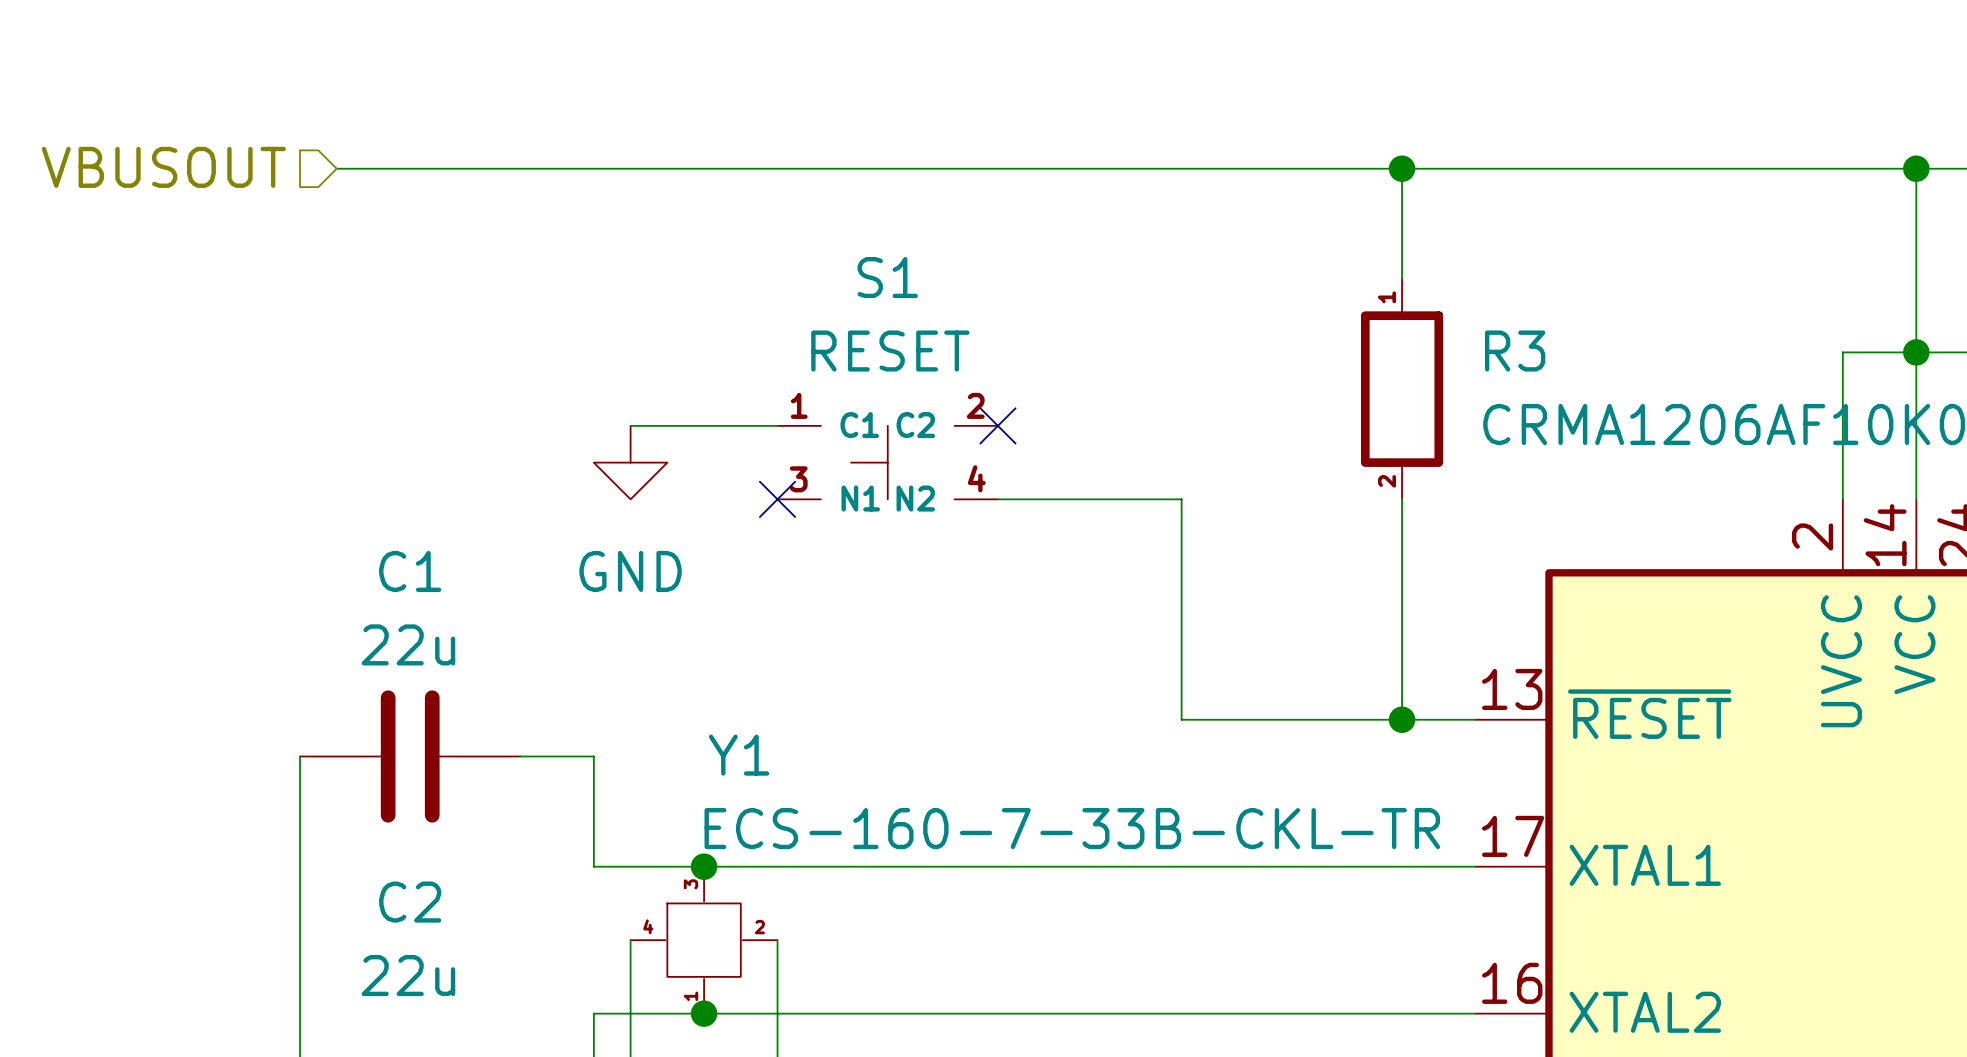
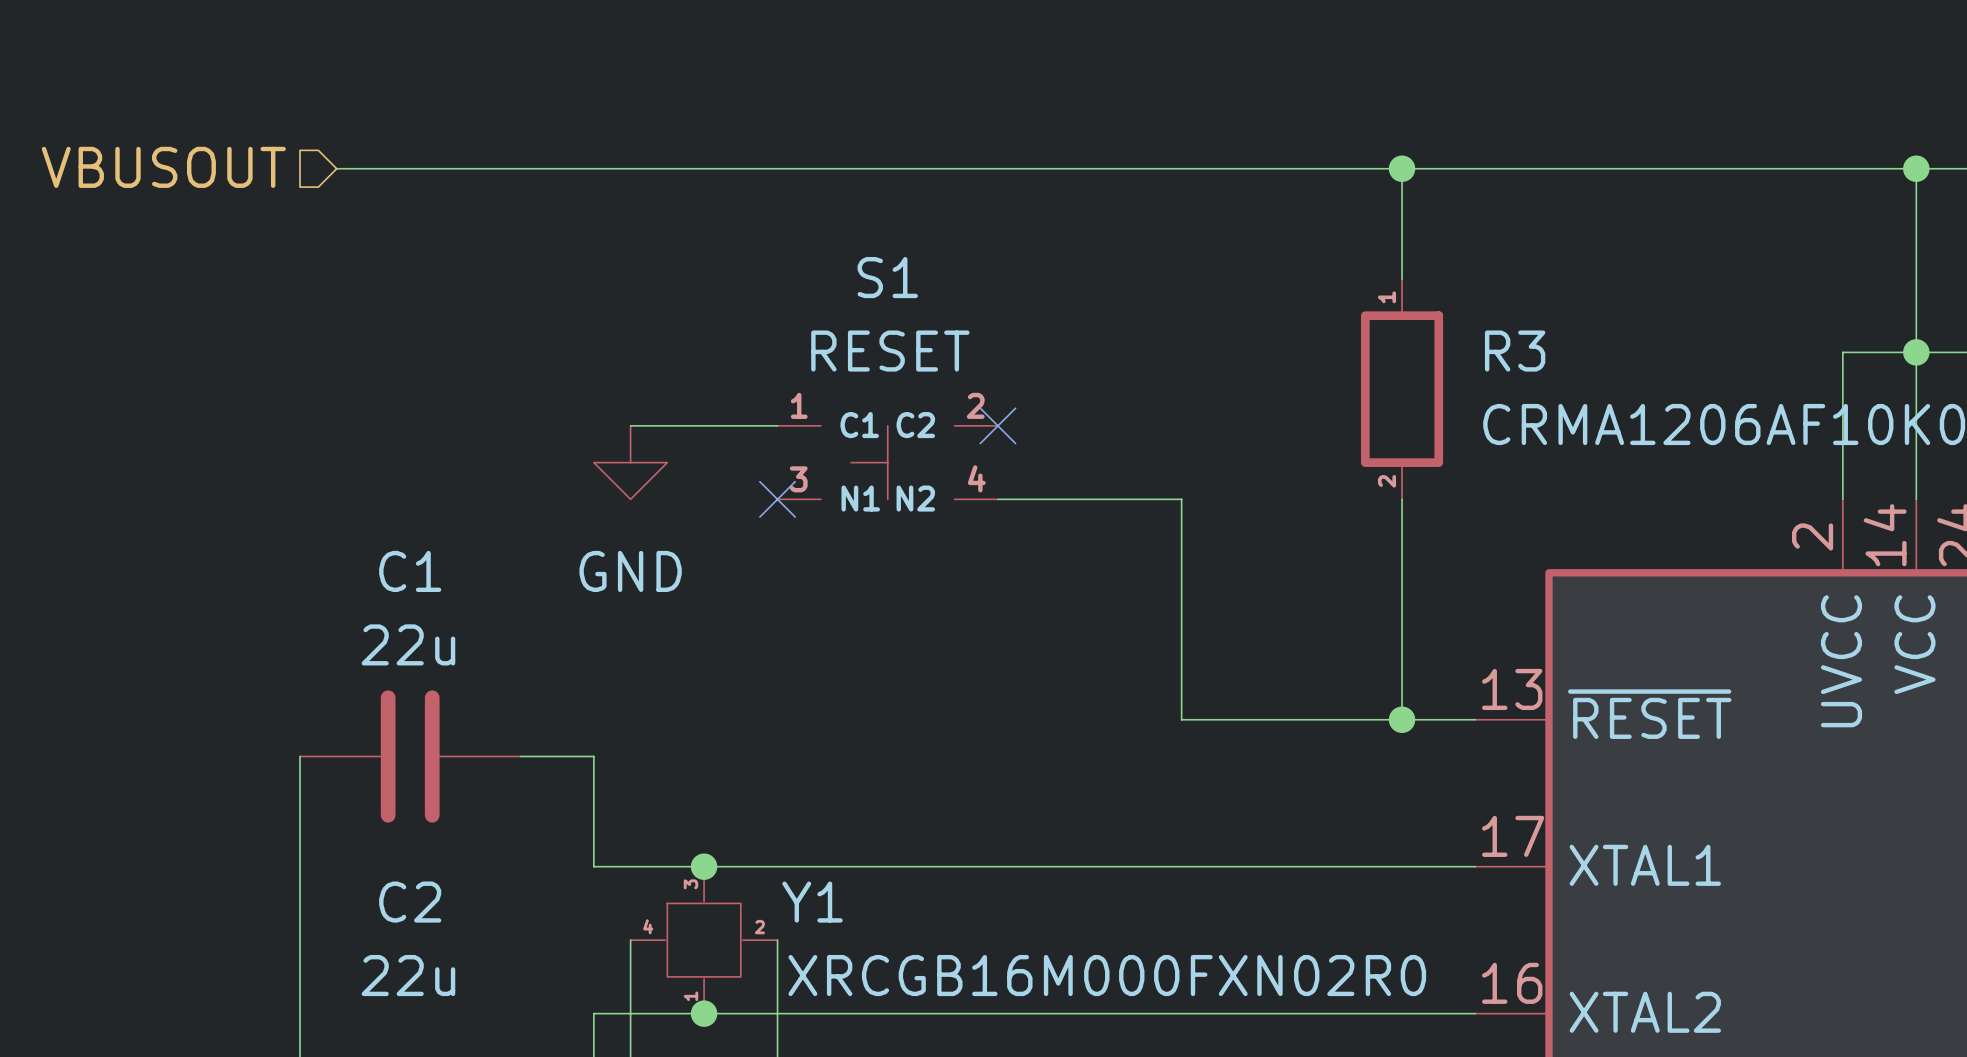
Y1 name position: Y1 (739, 755) -> Y1 (812, 902)
Y1 value: ECS-160-7-33B-CKL-TR (1072, 828) -> XRCGB16M000FXN02R0 (1107, 975)

